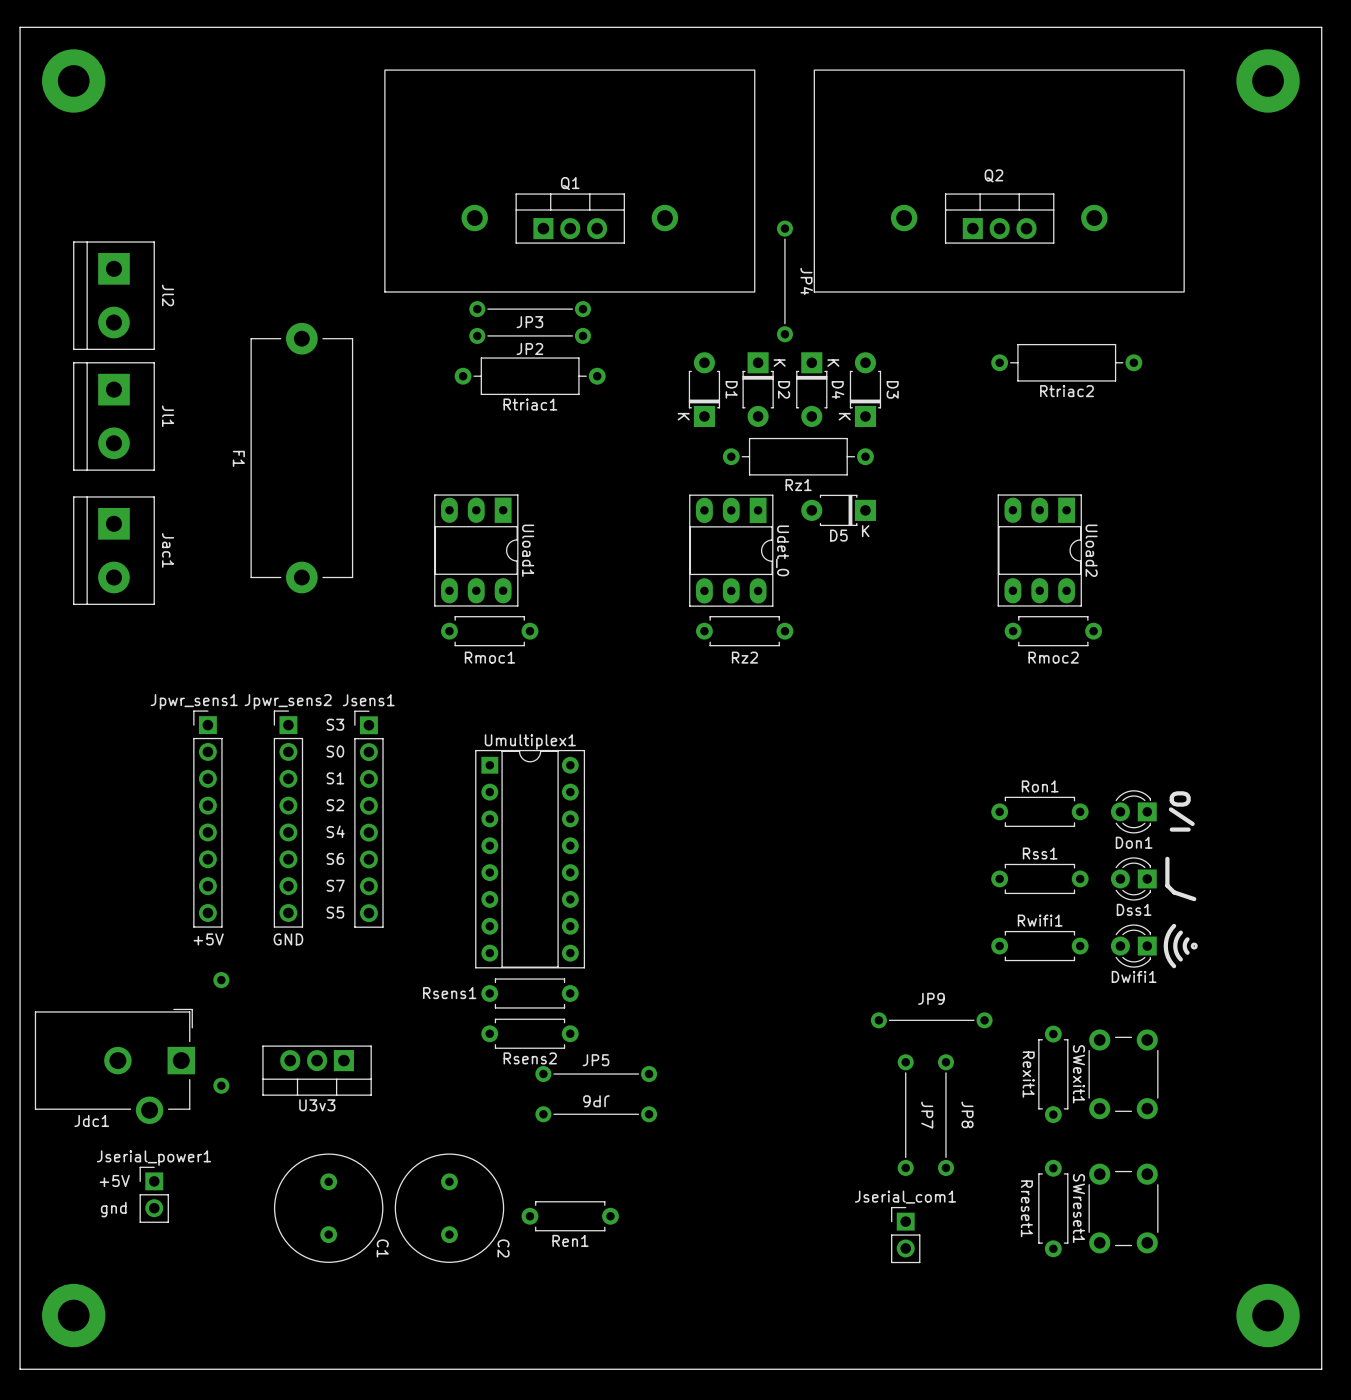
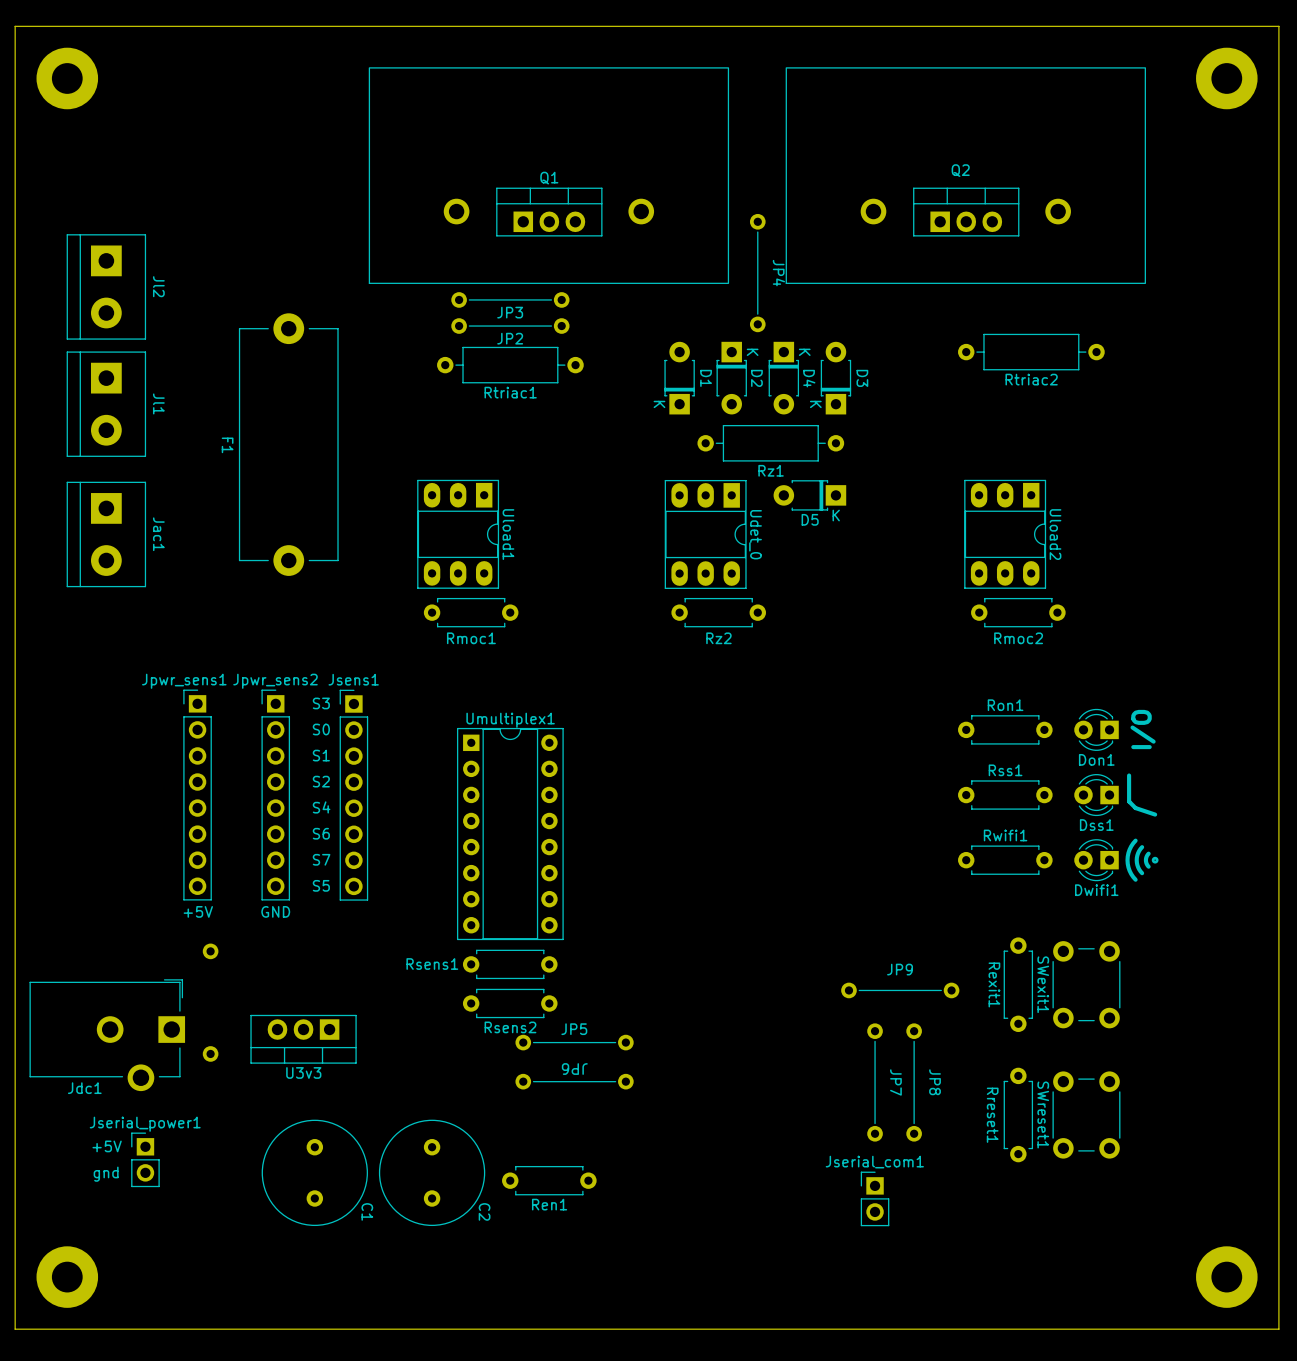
Ron1 position: (1039, 811) -> (1005, 729)
Don1 position: (1133, 811) -> (1096, 729)
text position: I/O (1181, 811) -> I/O (1143, 729)
line: (1167, 858) (1167, 885) (1174, 892) (1194, 899) -> (1129, 775) (1129, 801) (1135, 808) (1155, 814)
Rss1 position: (1039, 878) -> (1005, 795)
Dss1 position: (1133, 878) -> (1096, 795)
line: (1174, 925) (1167, 935) (1165, 946) (1167, 956) (1174, 966) -> (1135, 840) (1129, 849) (1127, 860) (1129, 870) (1135, 879)
line: (1180, 932) (1175, 946) (1180, 959) -> (1142, 847) (1136, 860) (1142, 873)
line: (1187, 939) (1184, 946) (1187, 952) -> (1148, 853) (1145, 860) (1148, 866)
Rwifi1 position: (1039, 946) -> (1005, 860)
Dwifi1 position: (1133, 946) -> (1096, 860)
drawing position: (1194, 946) -> (1155, 860)
Rexit1 position: (1053, 1074) -> (1018, 984)
SWexit1 position: (1123, 1074) -> (1086, 984)
Rreset1 position: (1053, 1208) -> (1018, 1115)
SWreset1 position: (1123, 1208) -> (1086, 1115)

